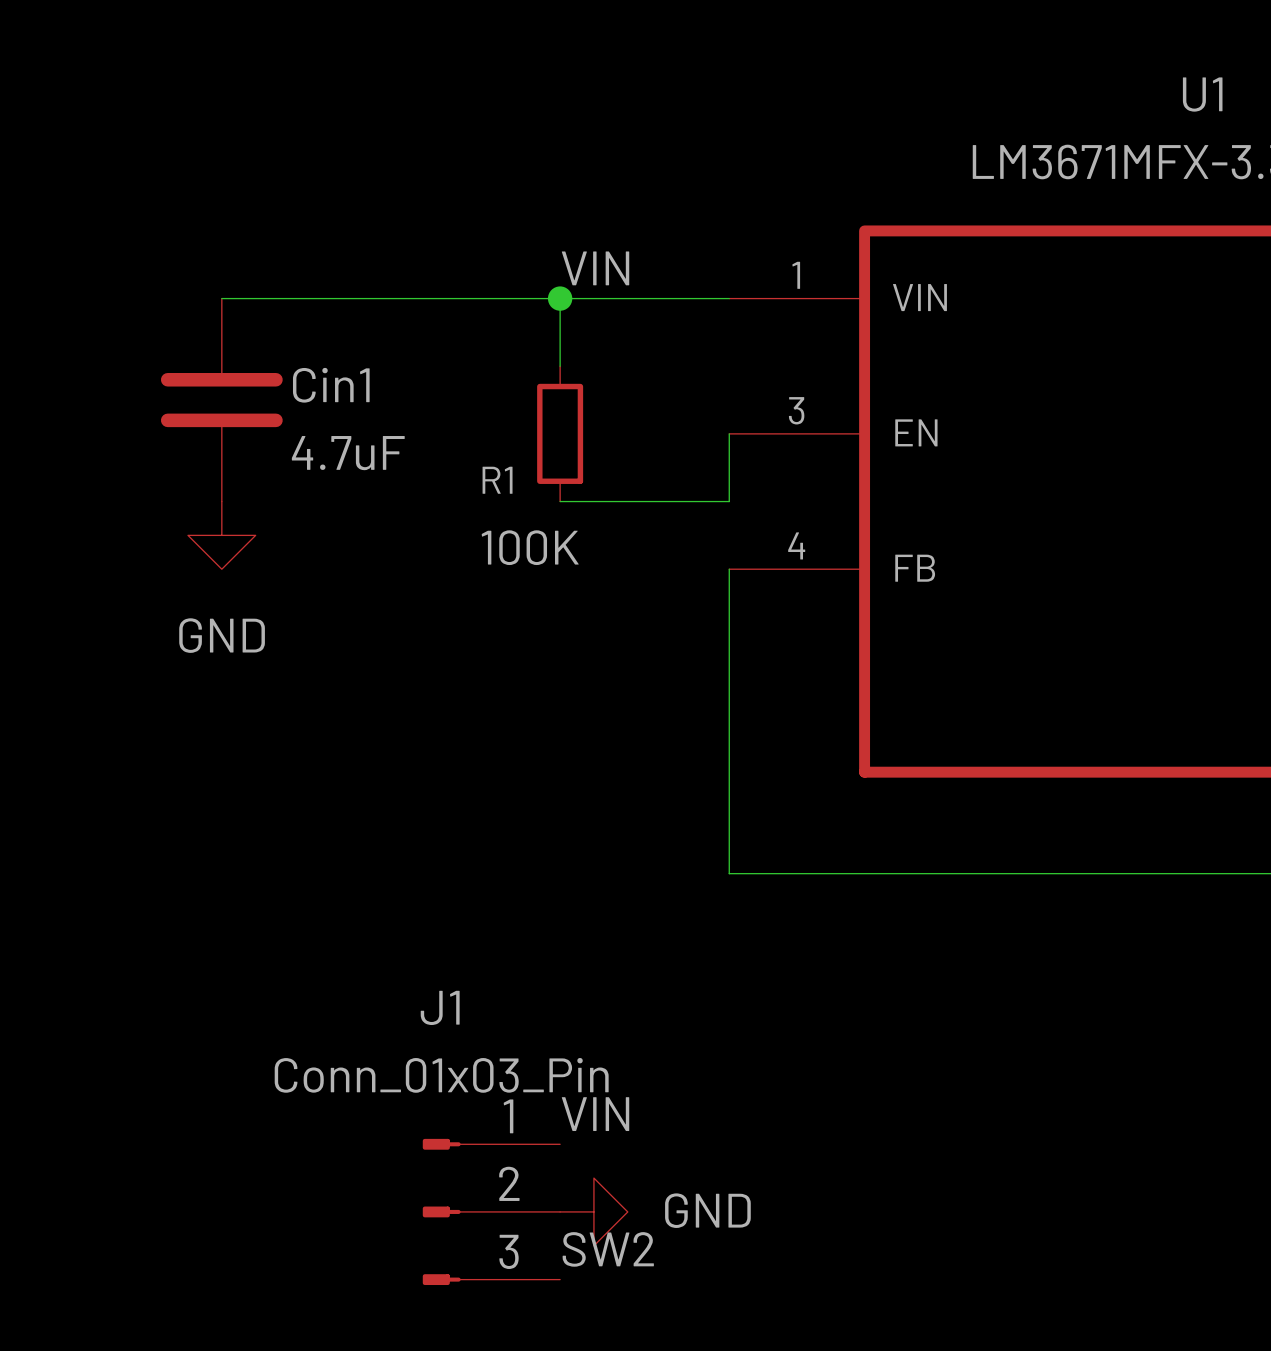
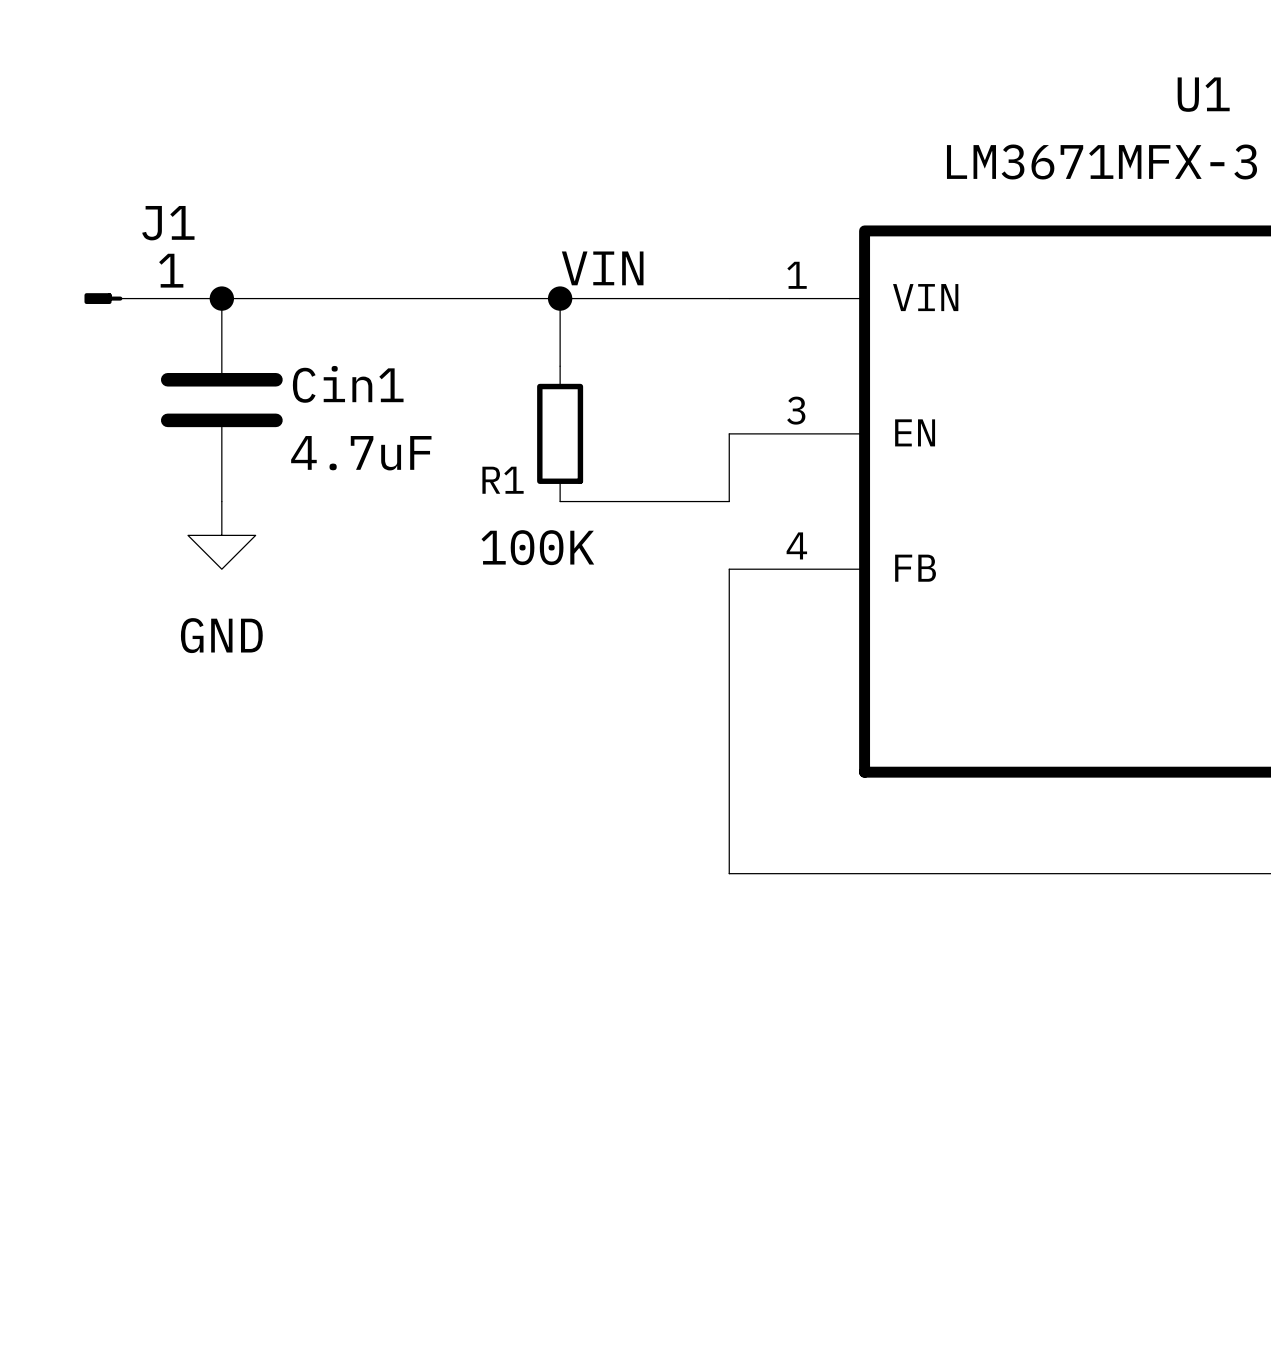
junction: none -> (221, 298)
J1 name position: J1 (440, 1007) -> J1 (168, 223)
J1 value: Conn_01x03_Pin (441, 1075) -> none
label: VIN (595, 1114) -> none
J1 symbol: [422, 1138, 561, 1286] -> [84, 293, 222, 304]
power symbol: GND (593, 1211) -> none
label: SW2 (608, 1249) -> none

